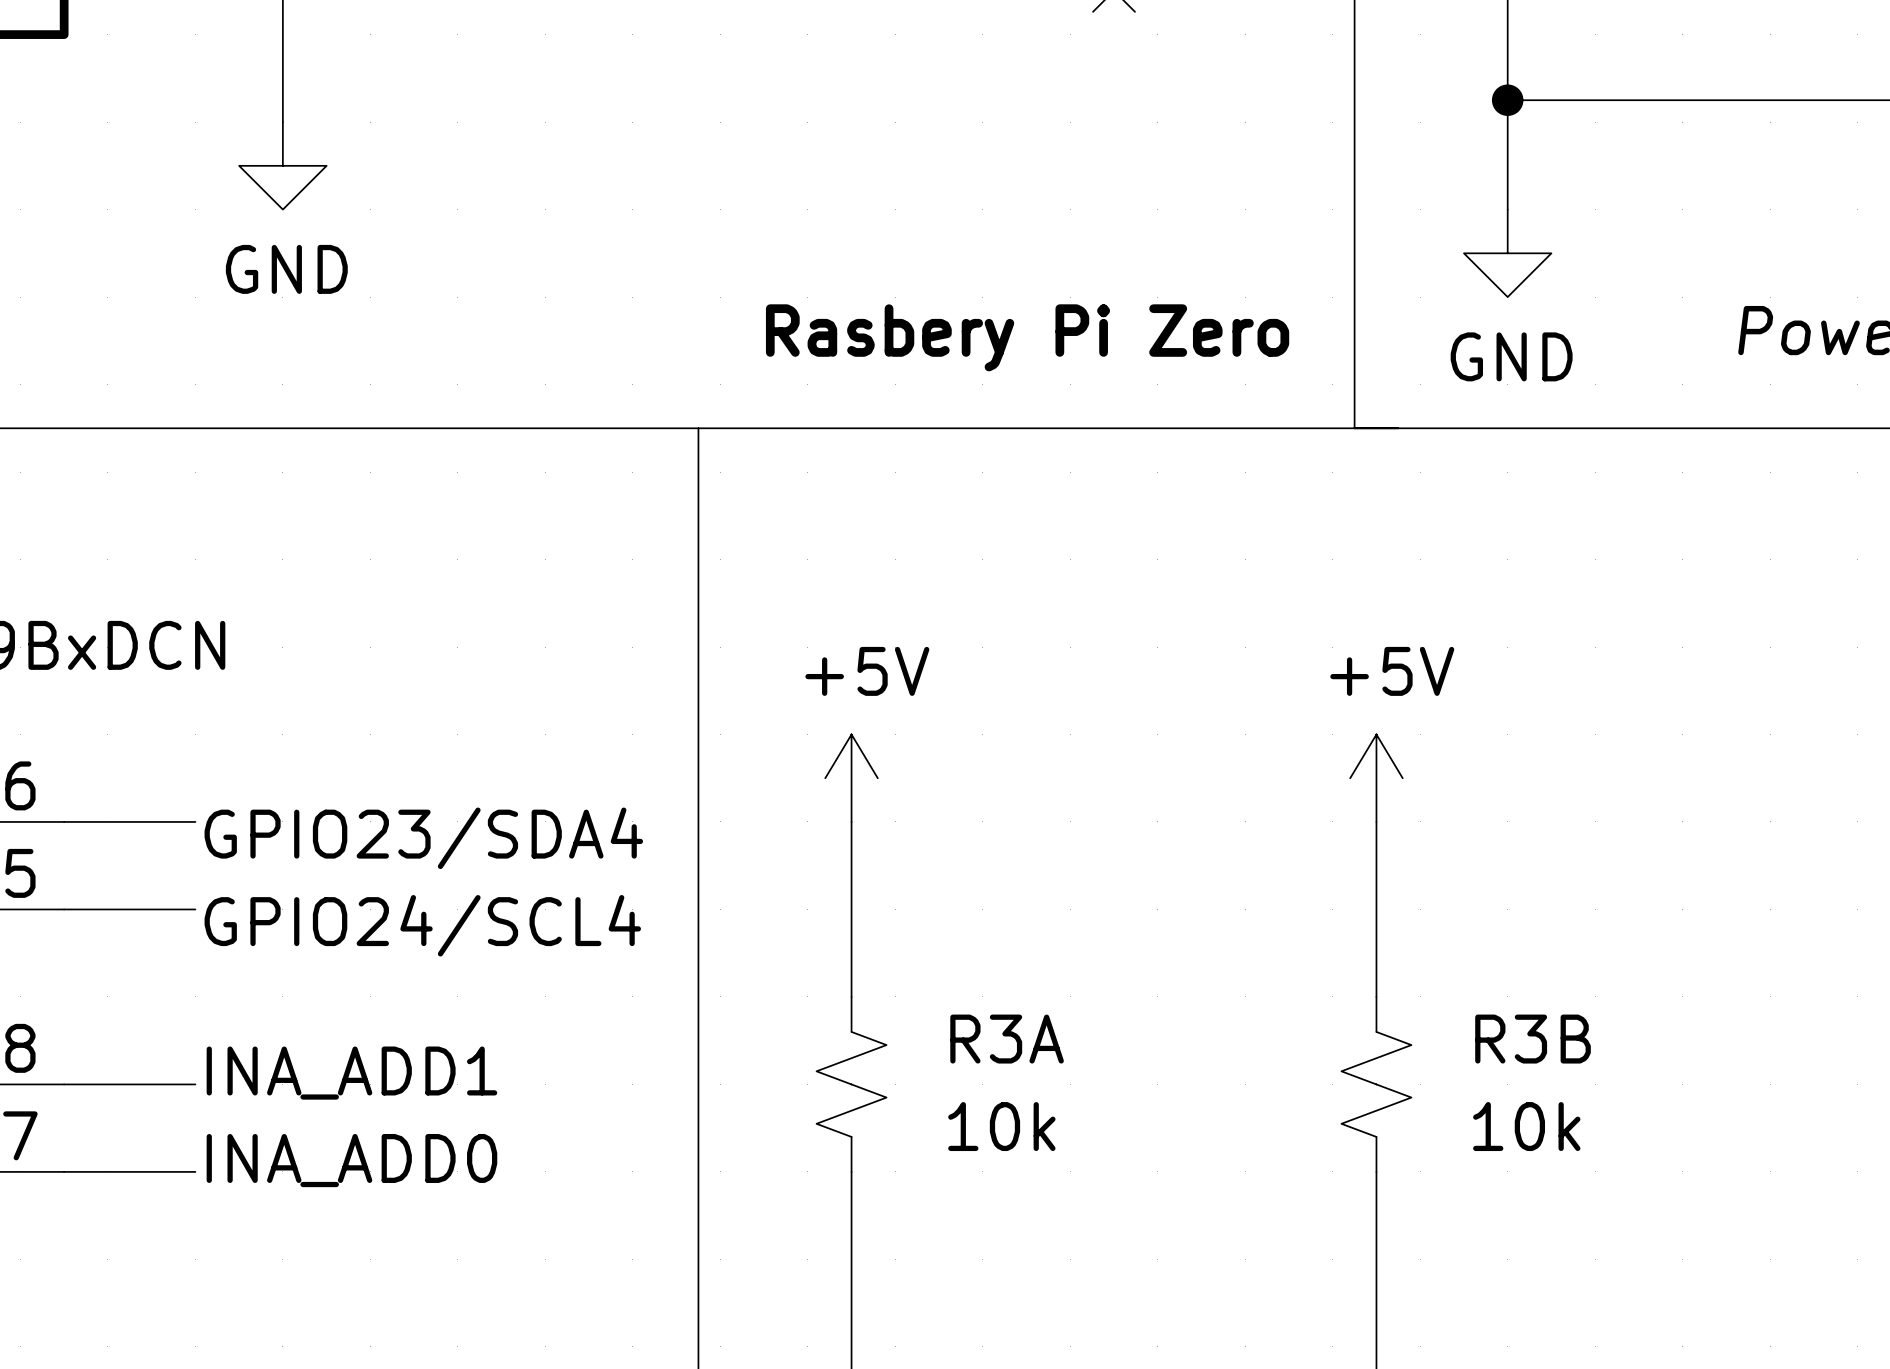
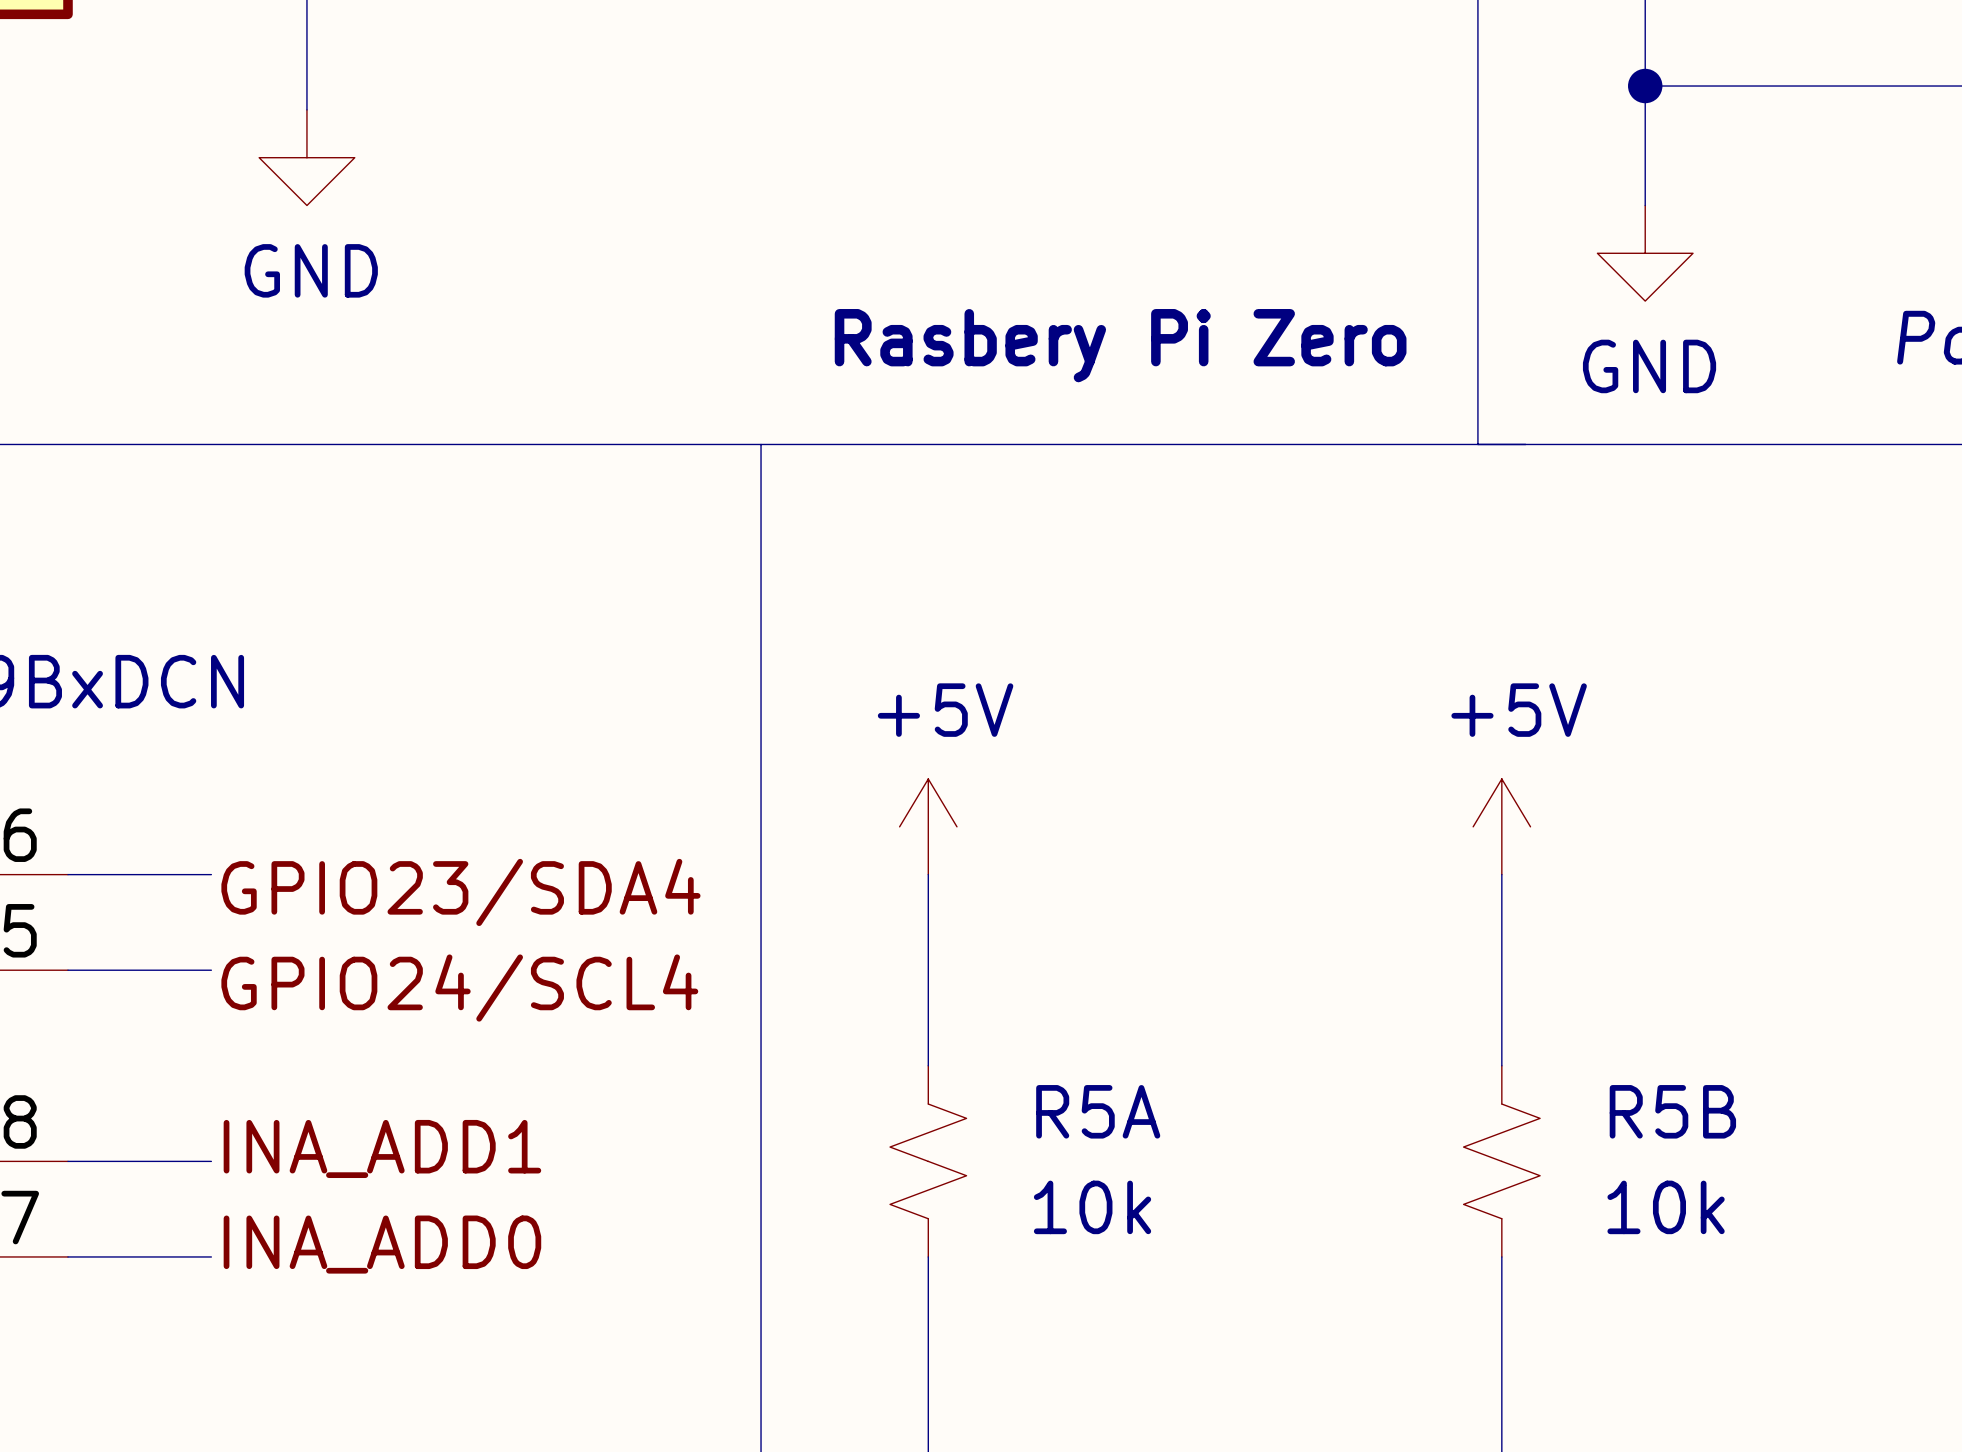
R3A name: R3A (1007, 1039) -> R5A (1098, 1111)
R3B name: R3B (1533, 1039) -> R5B (1672, 1111)

